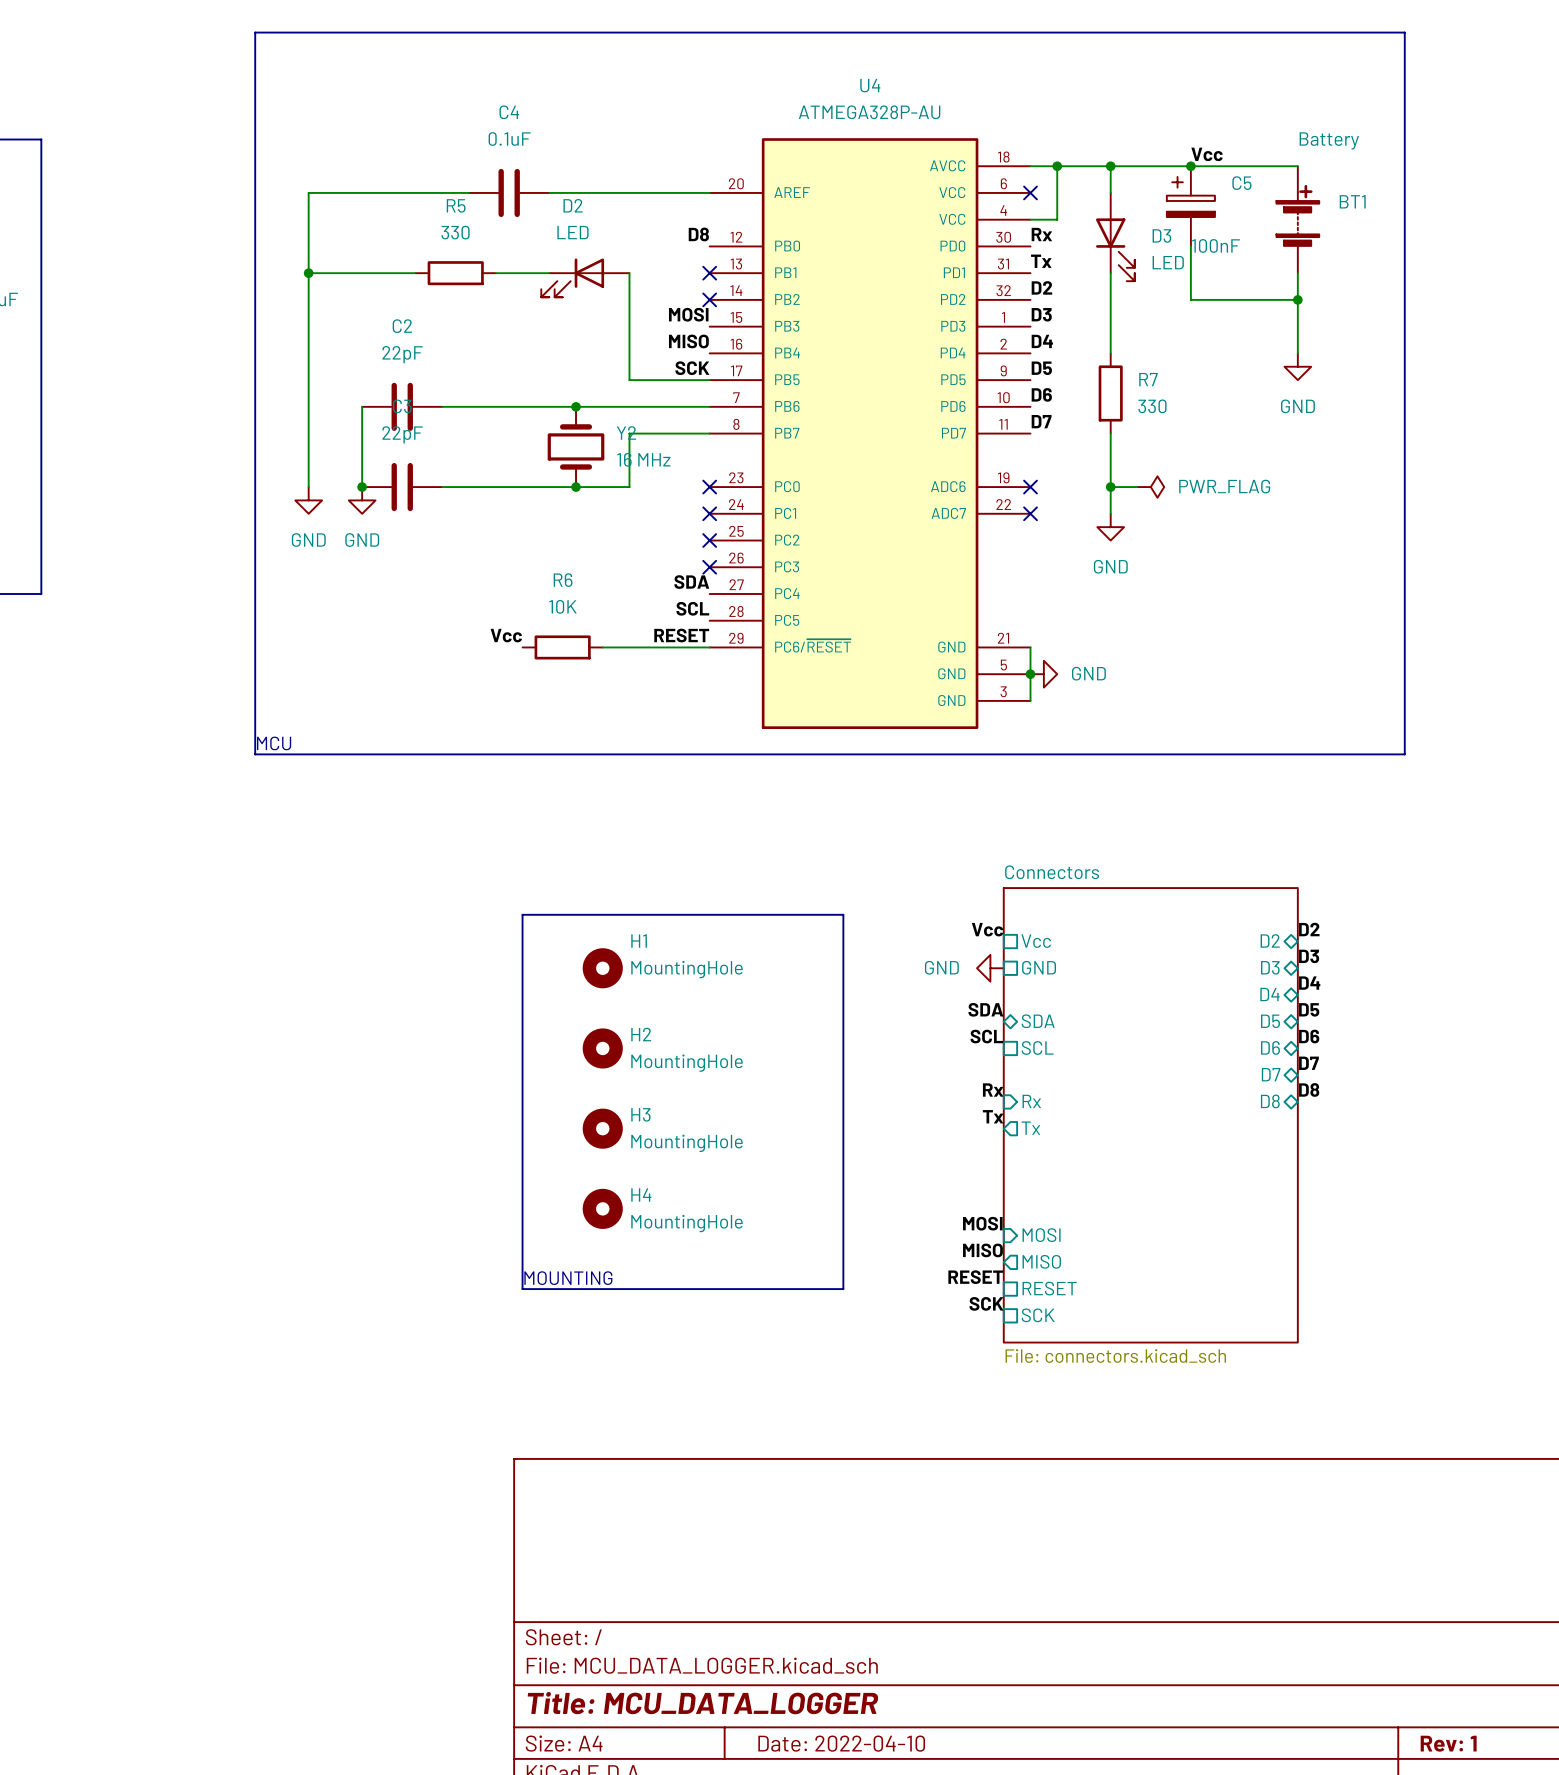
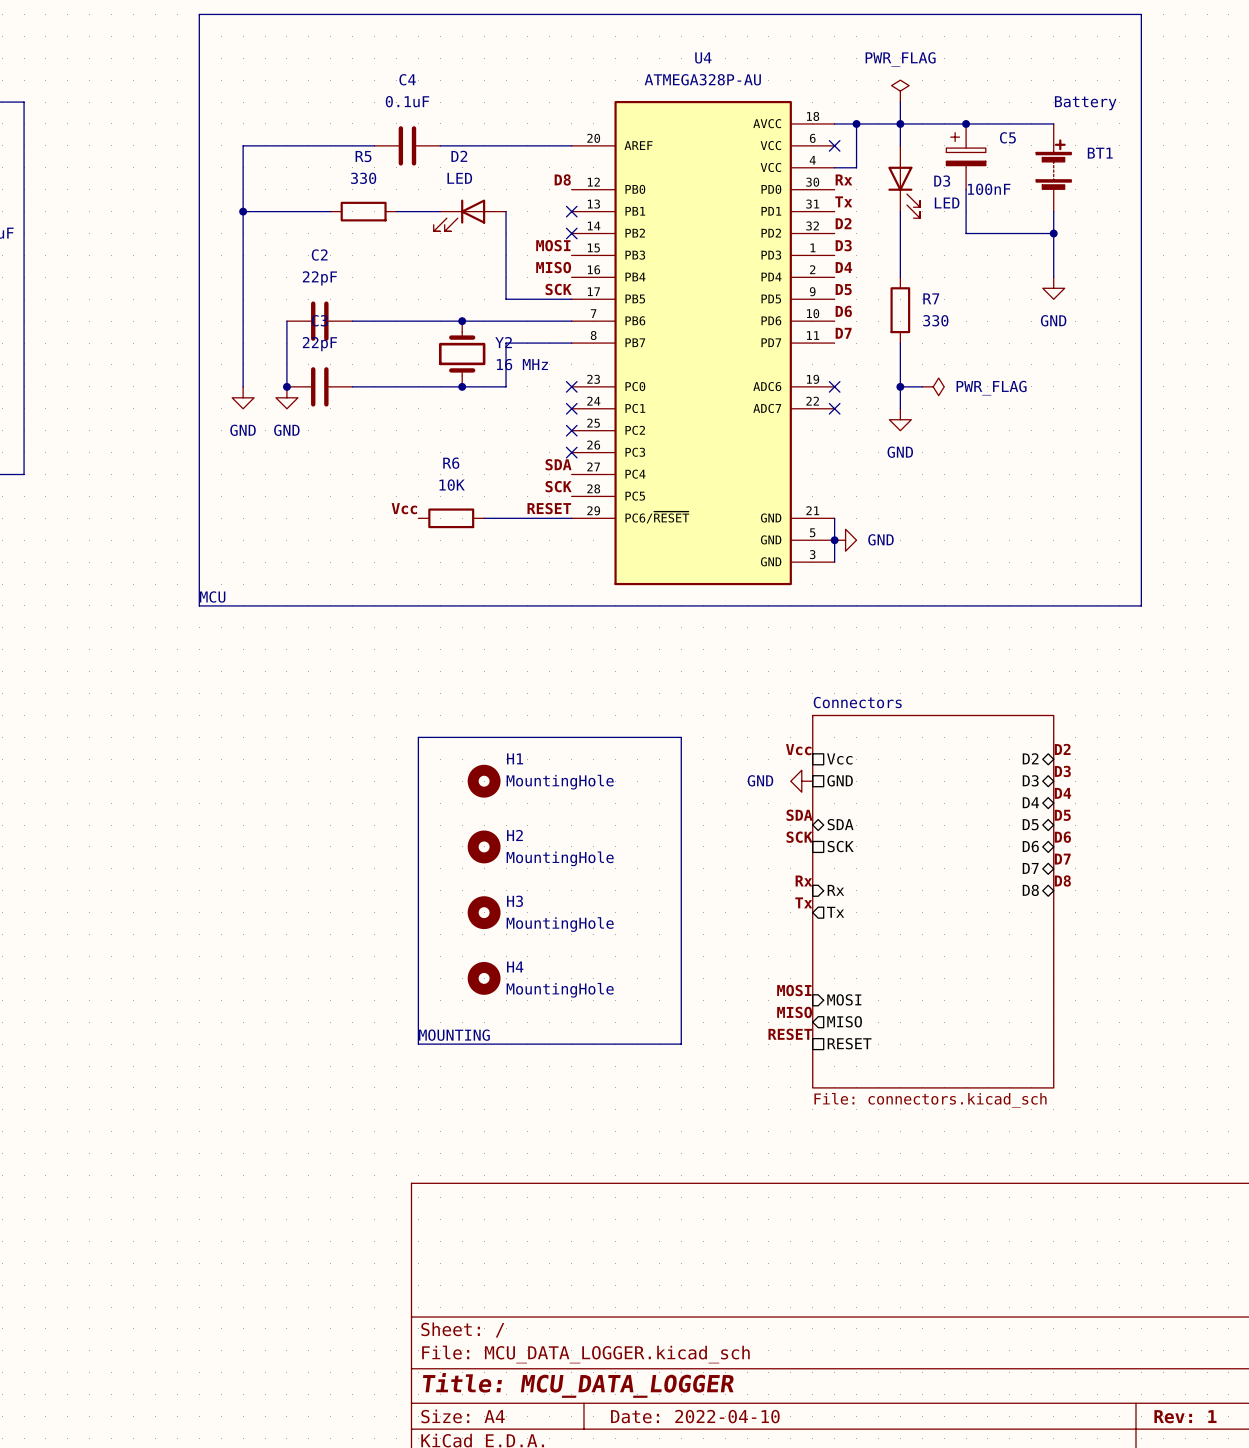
power symbol: none -> PWR_FLAG (900, 91)
wire: none -> (900, 102) (900, 123)
label: Vcc (1207, 154) -> none
label: SCL (692, 608) -> SCK (558, 486)
label: SCL (986, 1036) -> SCK (799, 837)
sheet pin: SCL (1037, 1047) -> SCK (840, 846)
label: SCK (986, 1303) -> none
sheet pin: SCK (1038, 1315) -> none

